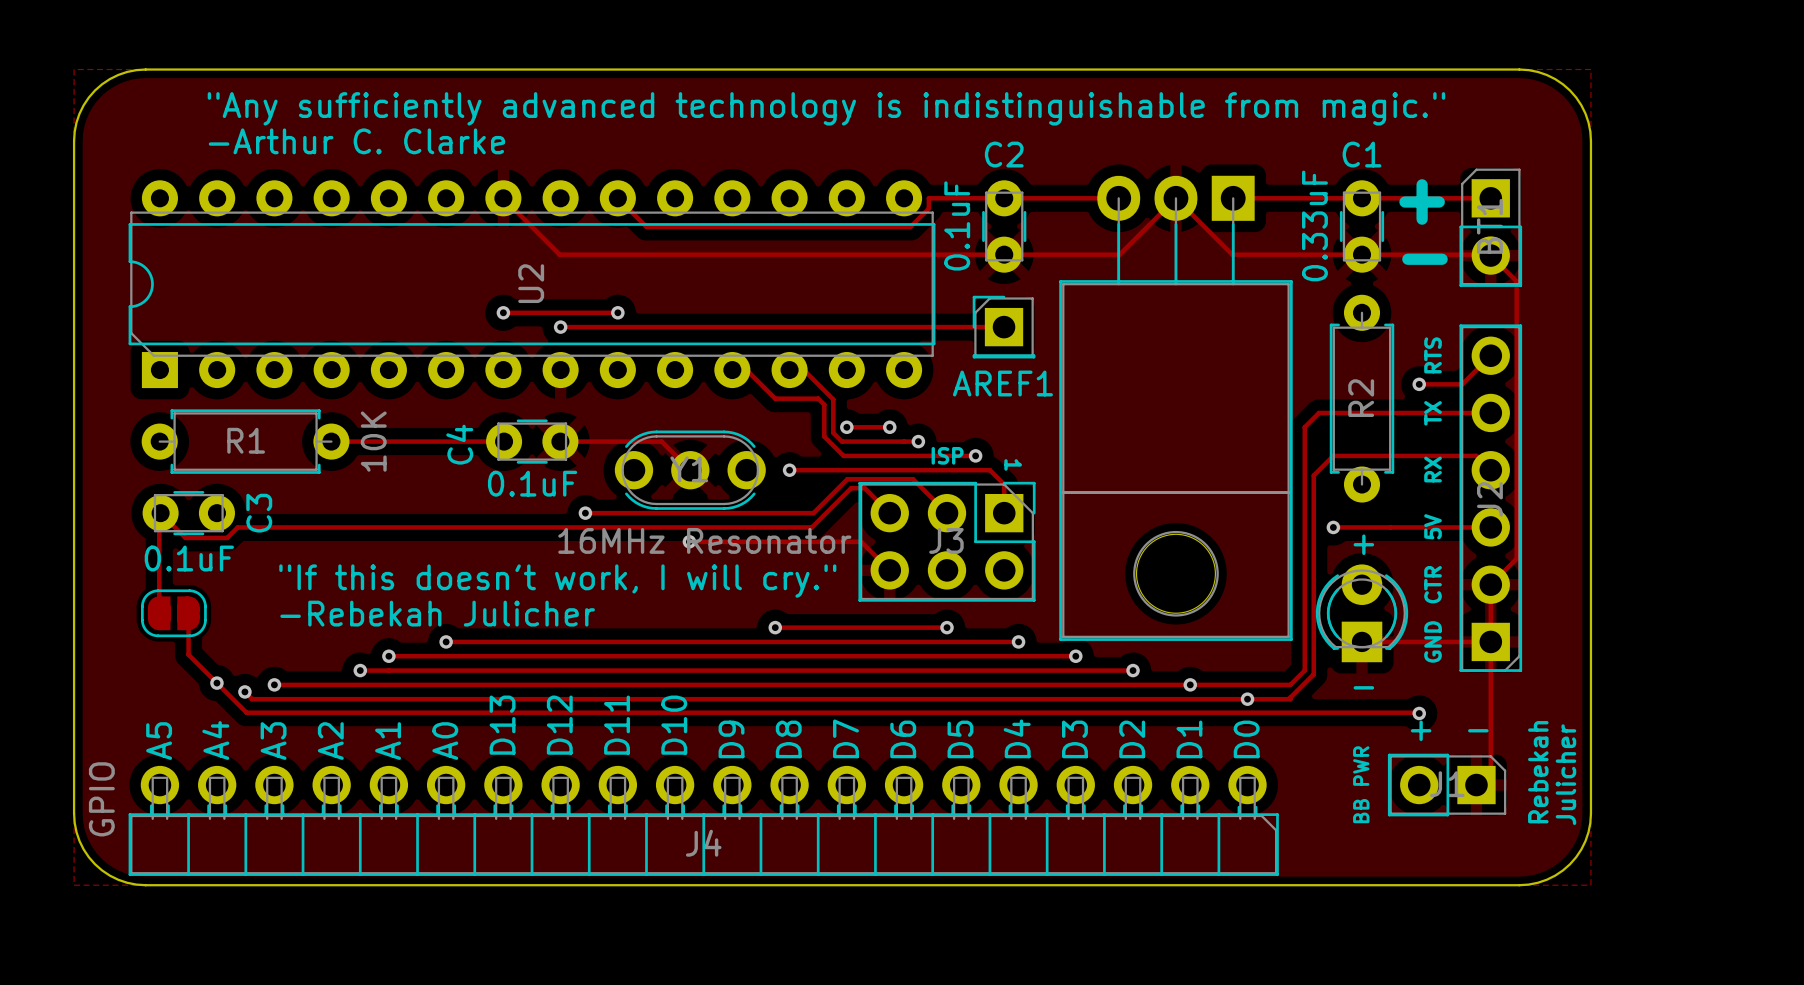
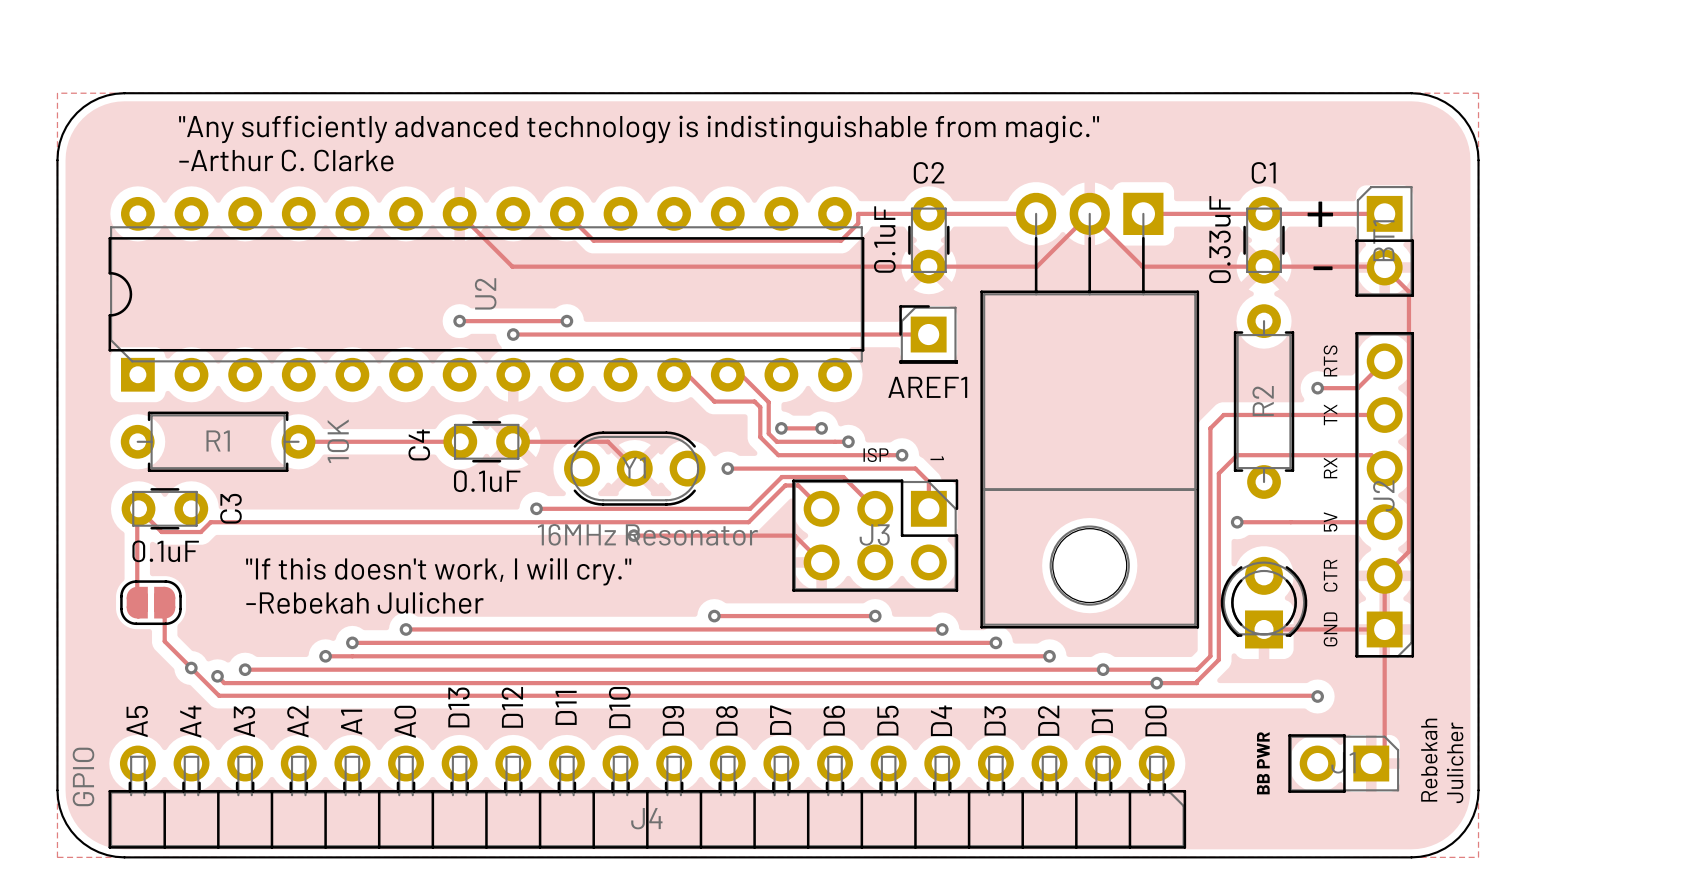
text: + (1363, 544) -> none
text: - (1363, 687) -> none
text: + (1421, 730) -> none
text: - (1478, 730) -> none

